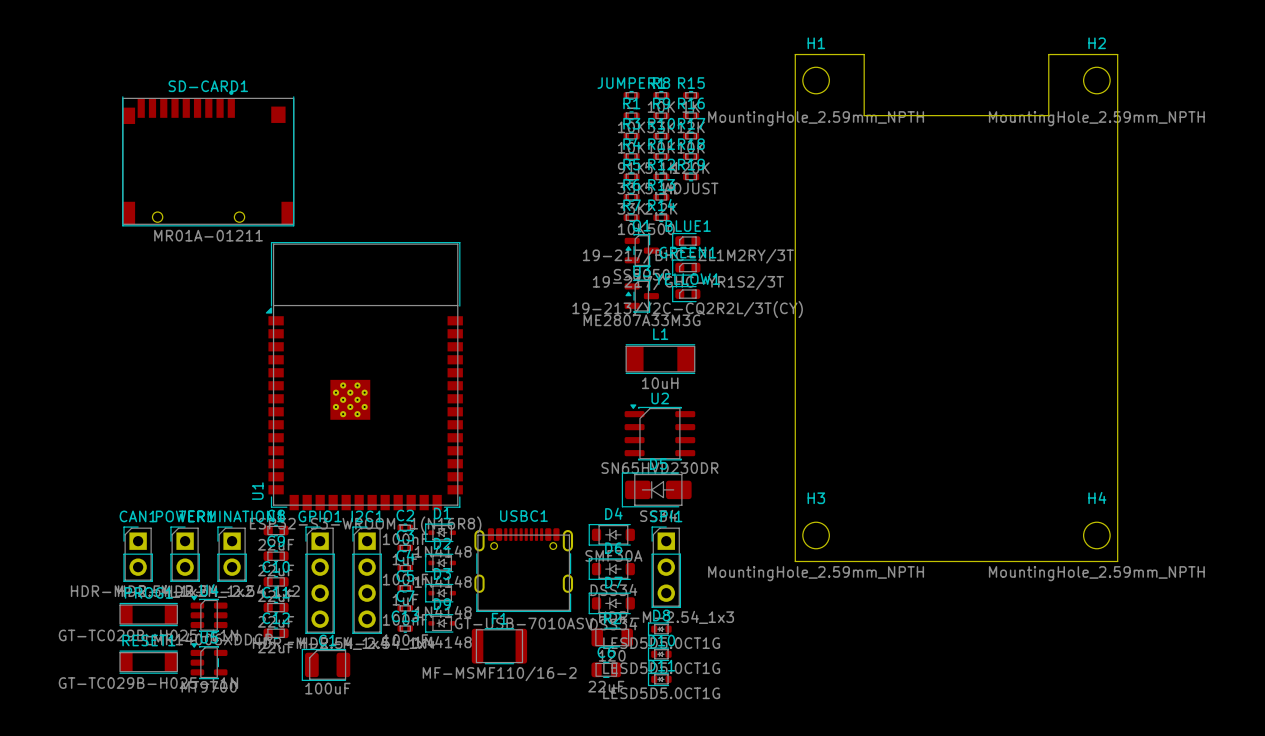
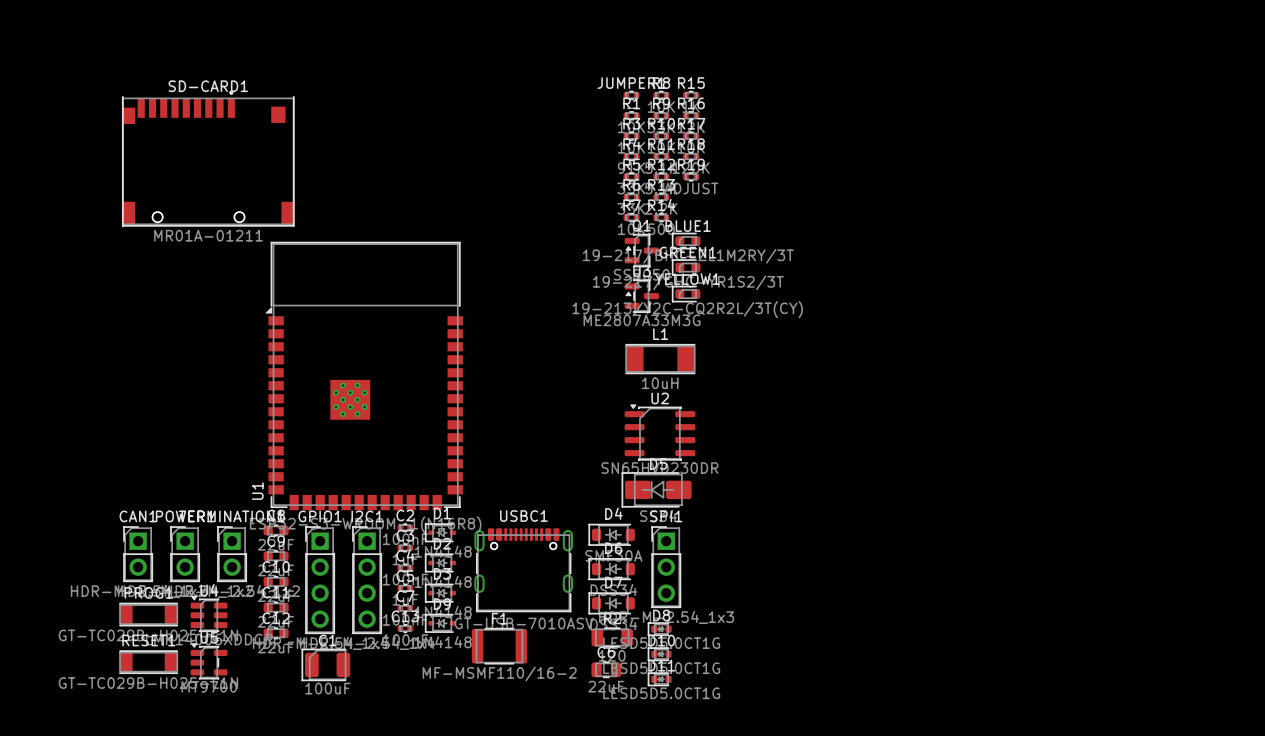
board edge: (795, 54) (864, 54) (864, 115) (1048, 115) (1048, 54) (1117, 54) (1117, 561) (795, 561) (795, 54) -> none
H1: MountingHole_2.59mm_NPTH (816, 80) -> none
H2: MountingHole_2.59mm_NPTH (1096, 80) -> none
H3: MountingHole_2.59mm_NPTH (816, 535) -> none
H4: MountingHole_2.59mm_NPTH (1096, 535) -> none

